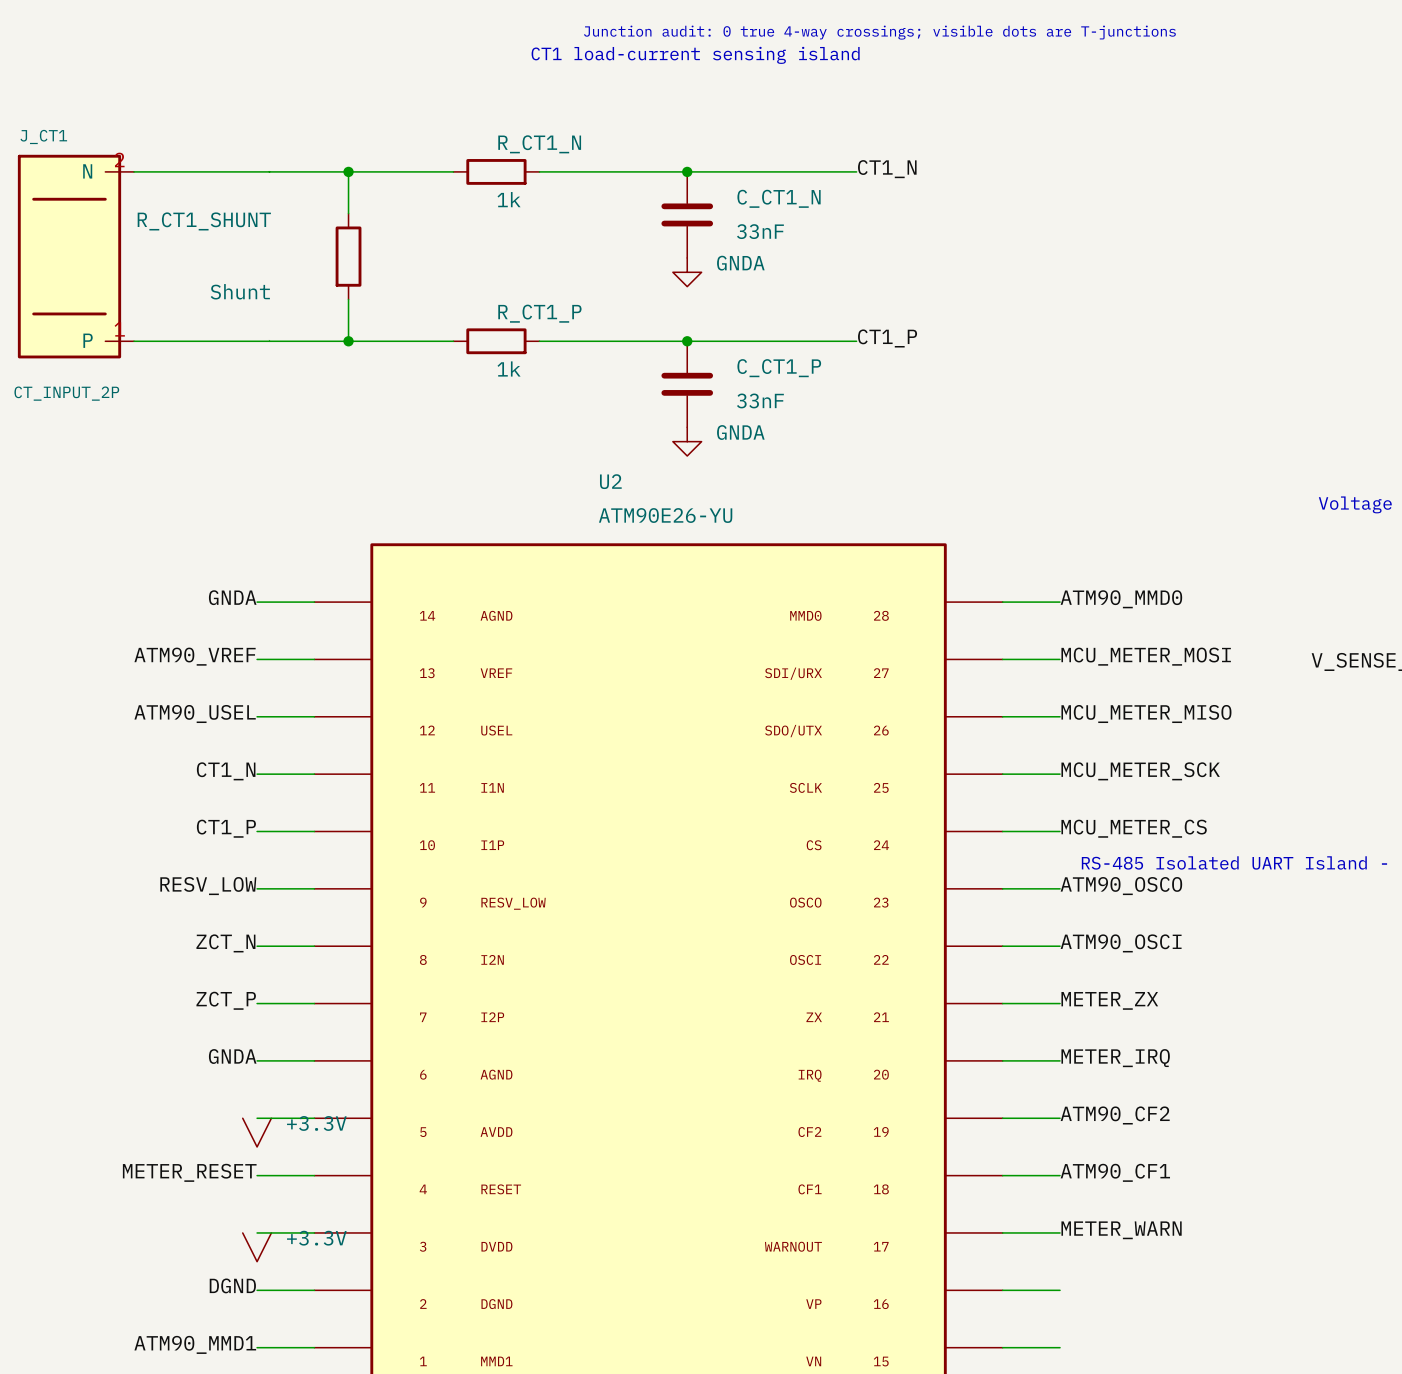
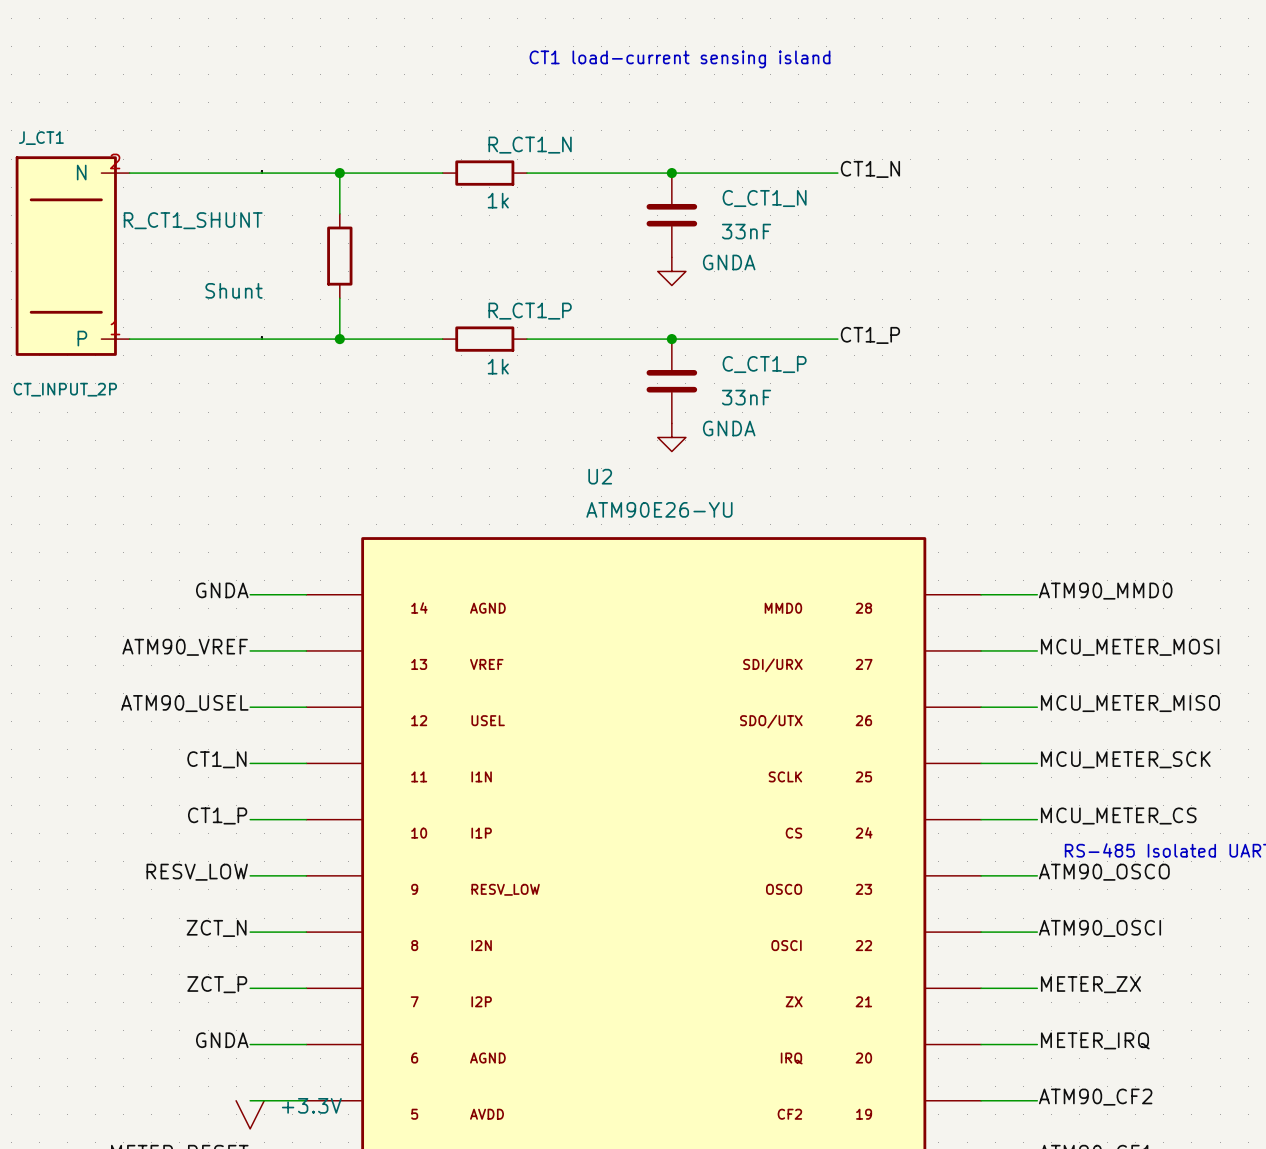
text: Junction audit: 0 true 4-way crossings; visible dots are T-junctions (879, 32) -> none

